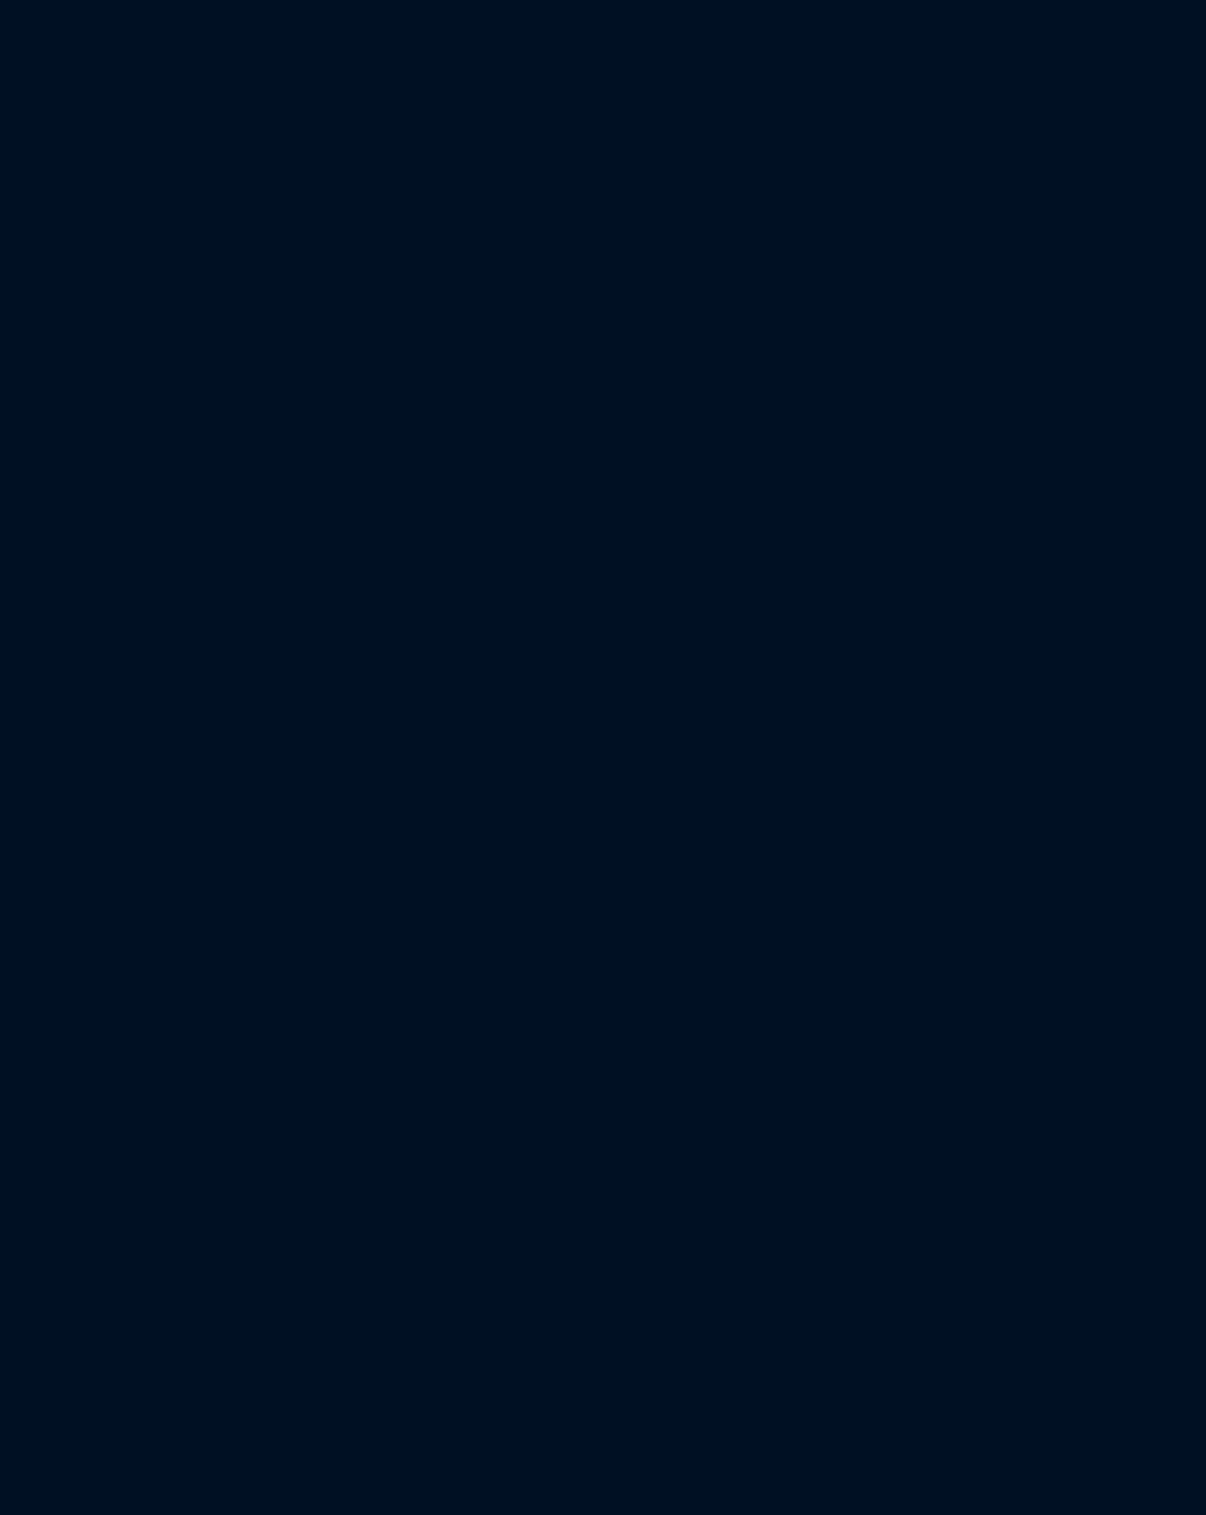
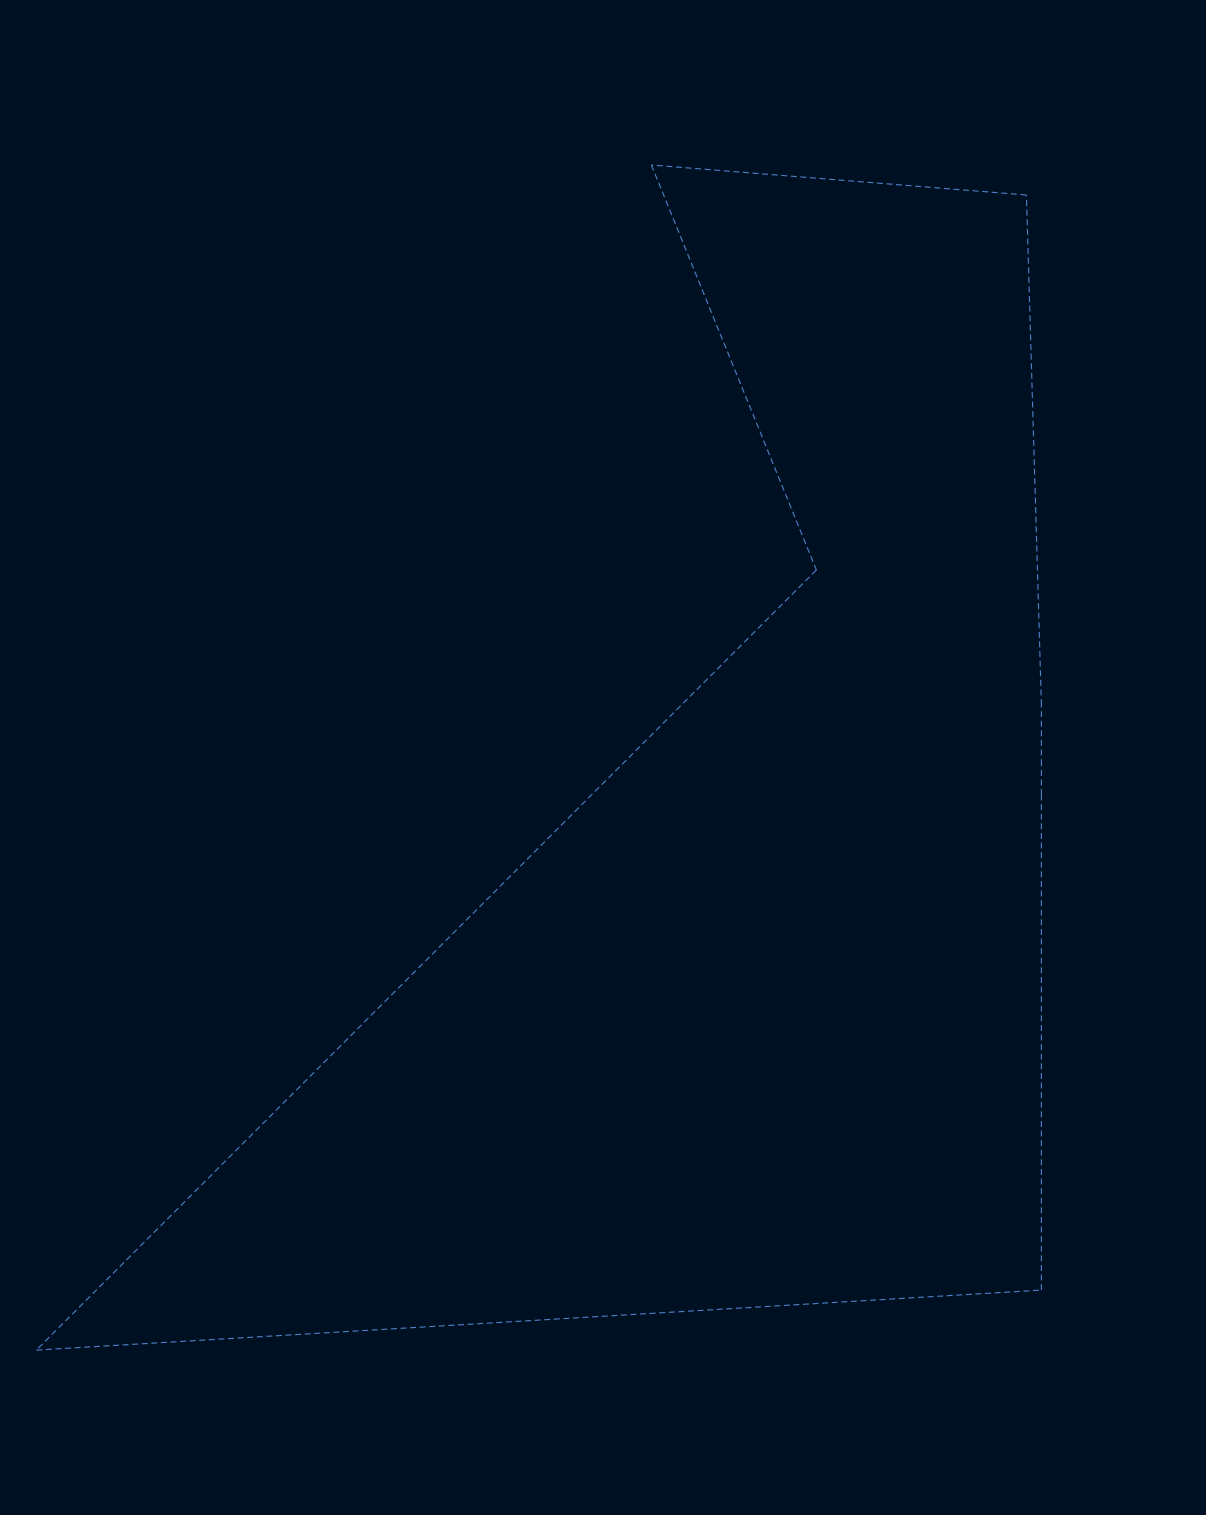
zone outline: none -> (651, 164) (1026, 194) (1041, 705) (1041, 1290) (36, 1350) (816, 570) (651, 164)

